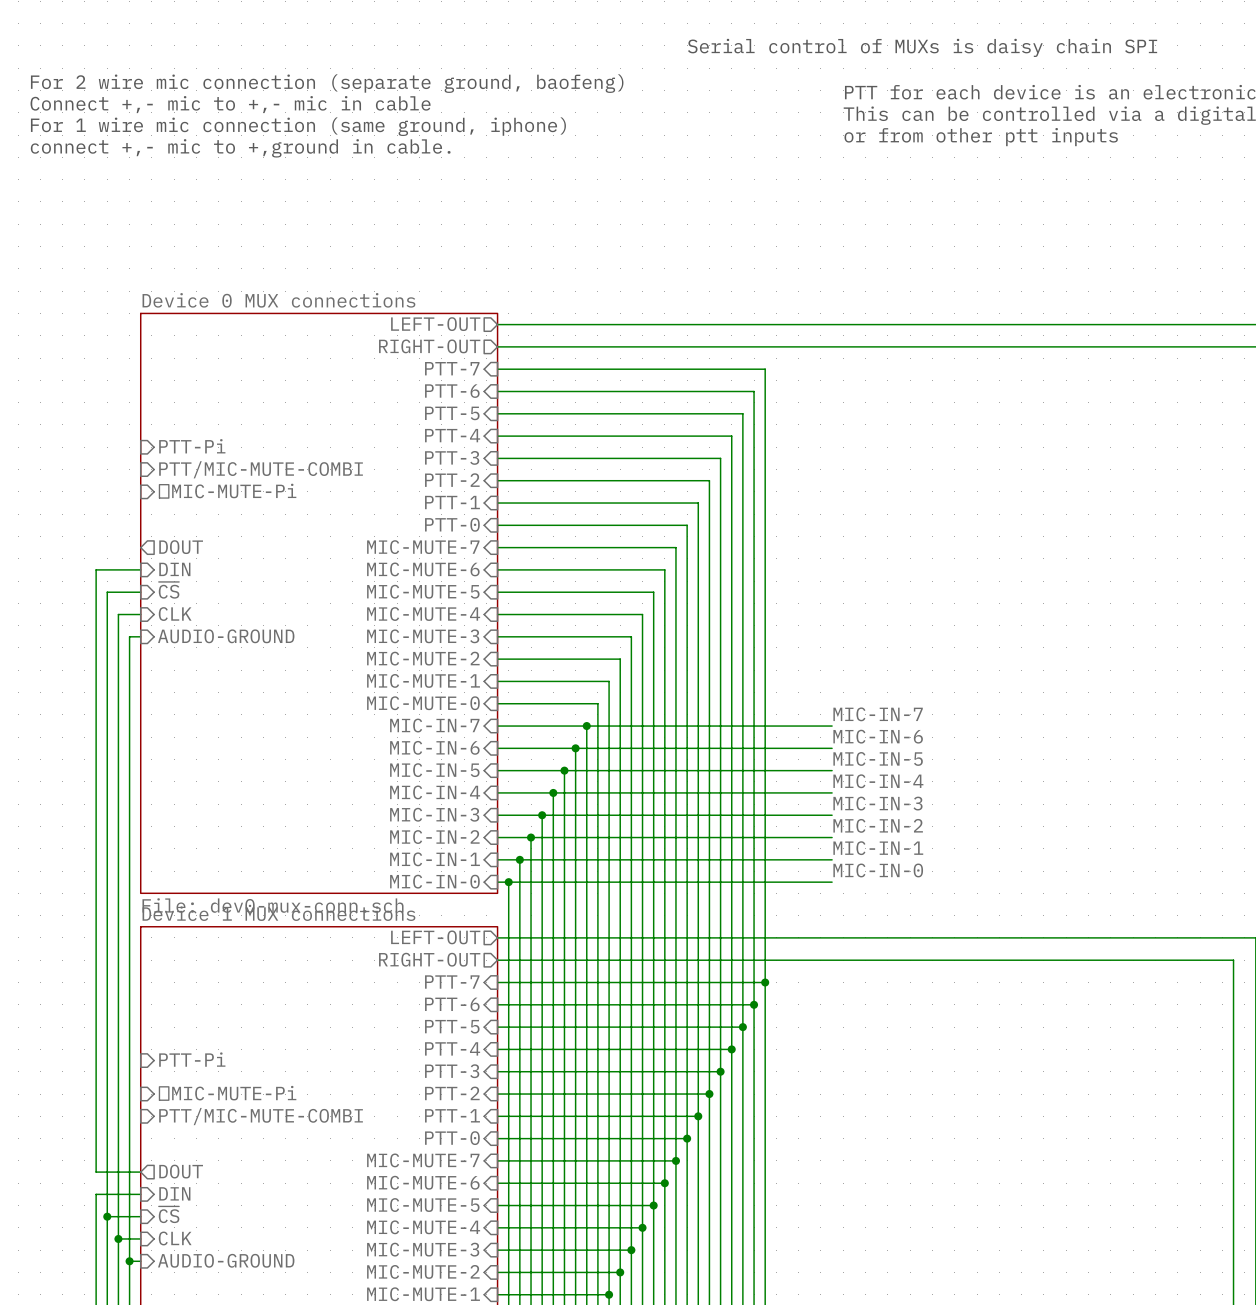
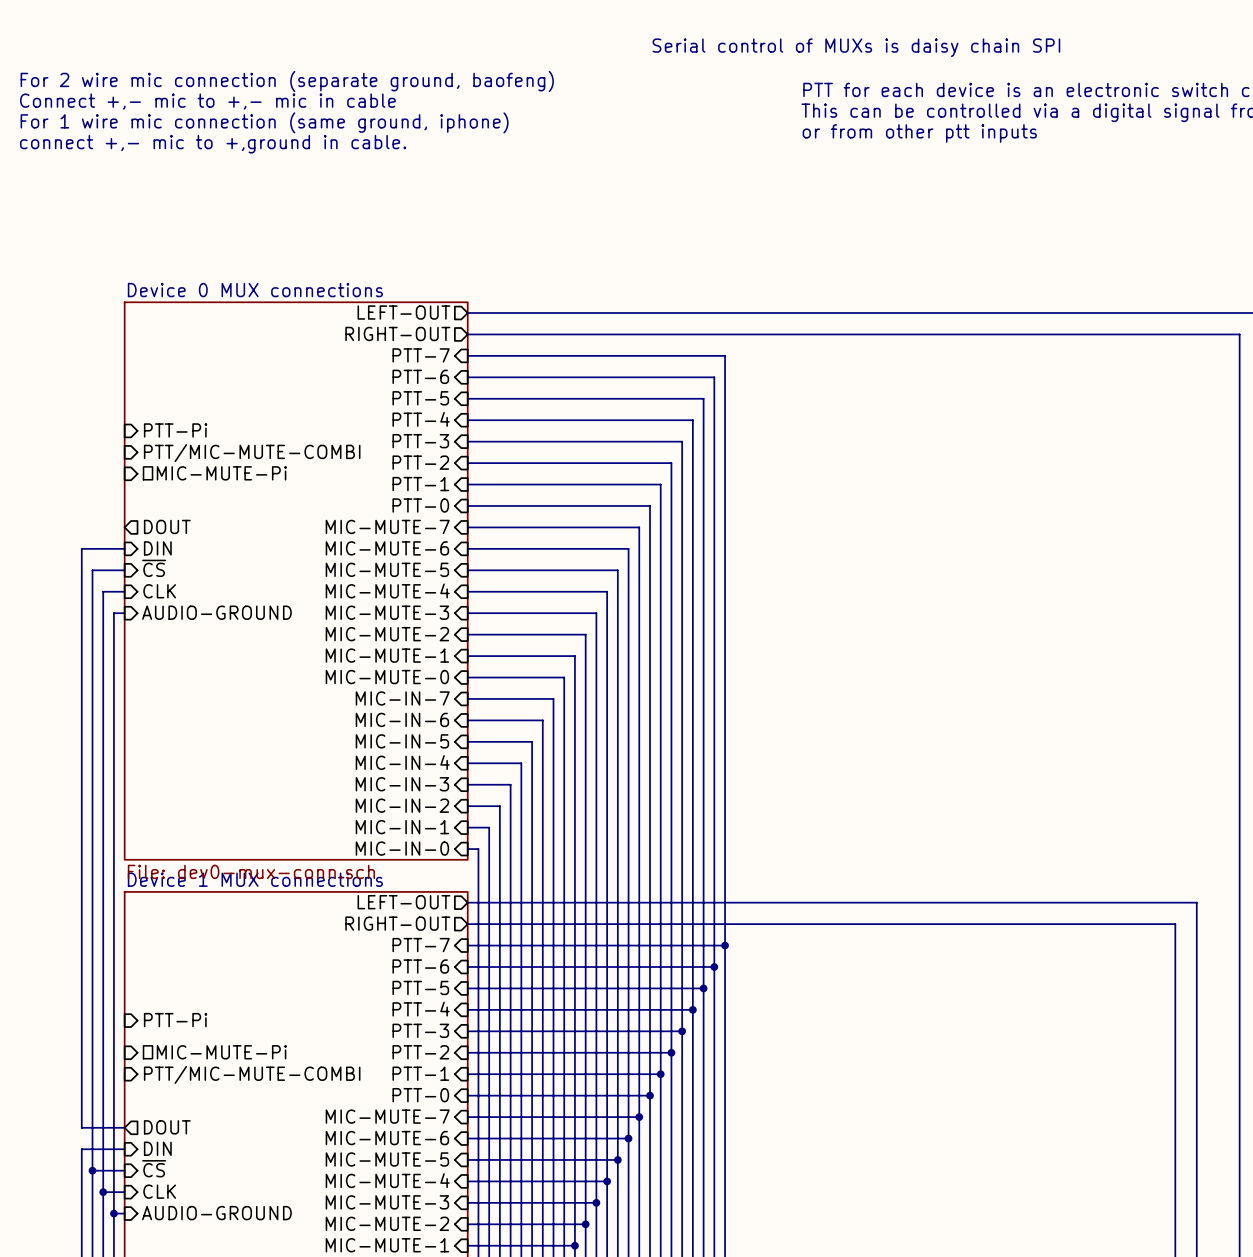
label: MIC-IN-7 (878, 714) -> none
wire: (586, 726) (832, 726) -> none
junction: (586, 726) -> none
label: MIC-IN-6 (878, 736) -> none
wire: (575, 748) (832, 748) -> none
junction: (575, 748) -> none
label: MIC-IN-5 (878, 758) -> none
wire: (564, 770) (832, 770) -> none
junction: (564, 770) -> none
label: MIC-IN-4 (878, 781) -> none
wire: (553, 792) (832, 792) -> none
junction: (553, 792) -> none
label: MIC-IN-3 (877, 803) -> none
wire: (542, 815) (832, 815) -> none
junction: (542, 815) -> none
label: MIC-IN-2 (878, 825) -> none
wire: (531, 837) (832, 837) -> none
junction: (531, 837) -> none
label: MIC-IN-1 (878, 848) -> none
wire: (519, 859) (832, 859) -> none
junction: (519, 859) -> none
label: MIC-IN-0 (878, 870) -> none
wire: (508, 882) (832, 882) -> none
junction: (508, 882) -> none

